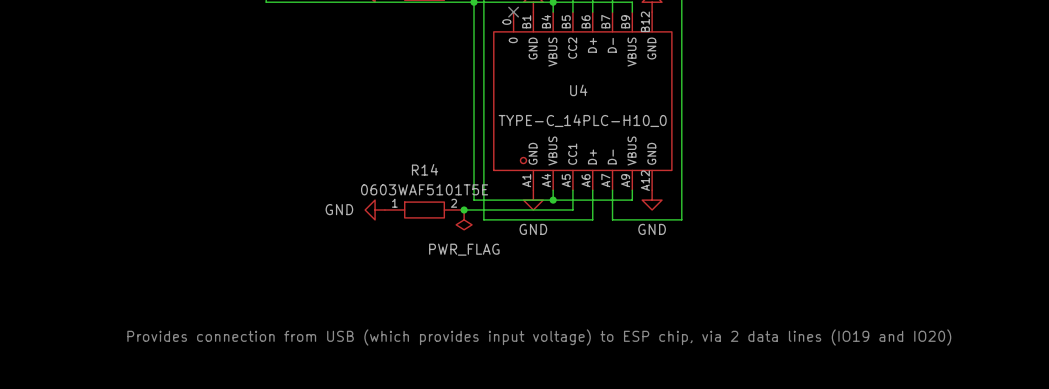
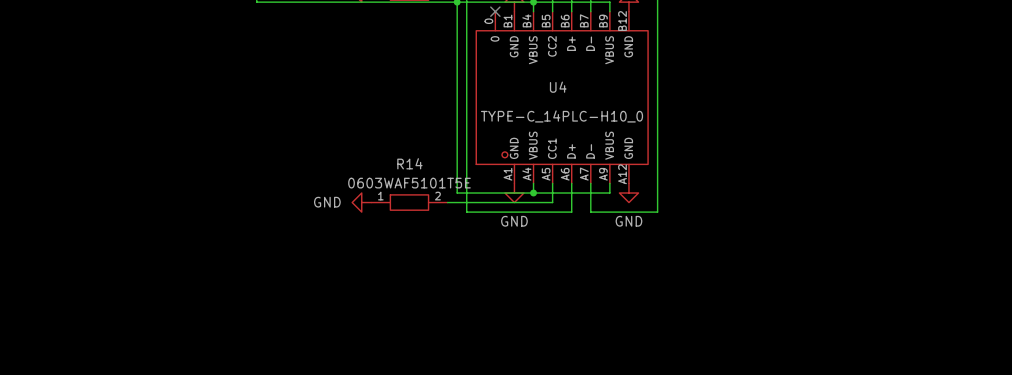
junction: (464, 210) -> none
power symbol: PWR_FLAG (464, 219) -> none
text: Provides connection from USB (which provides input voltage) to ESP chip, via 2 data lines (IO19 and IO20) (539, 337) -> none

